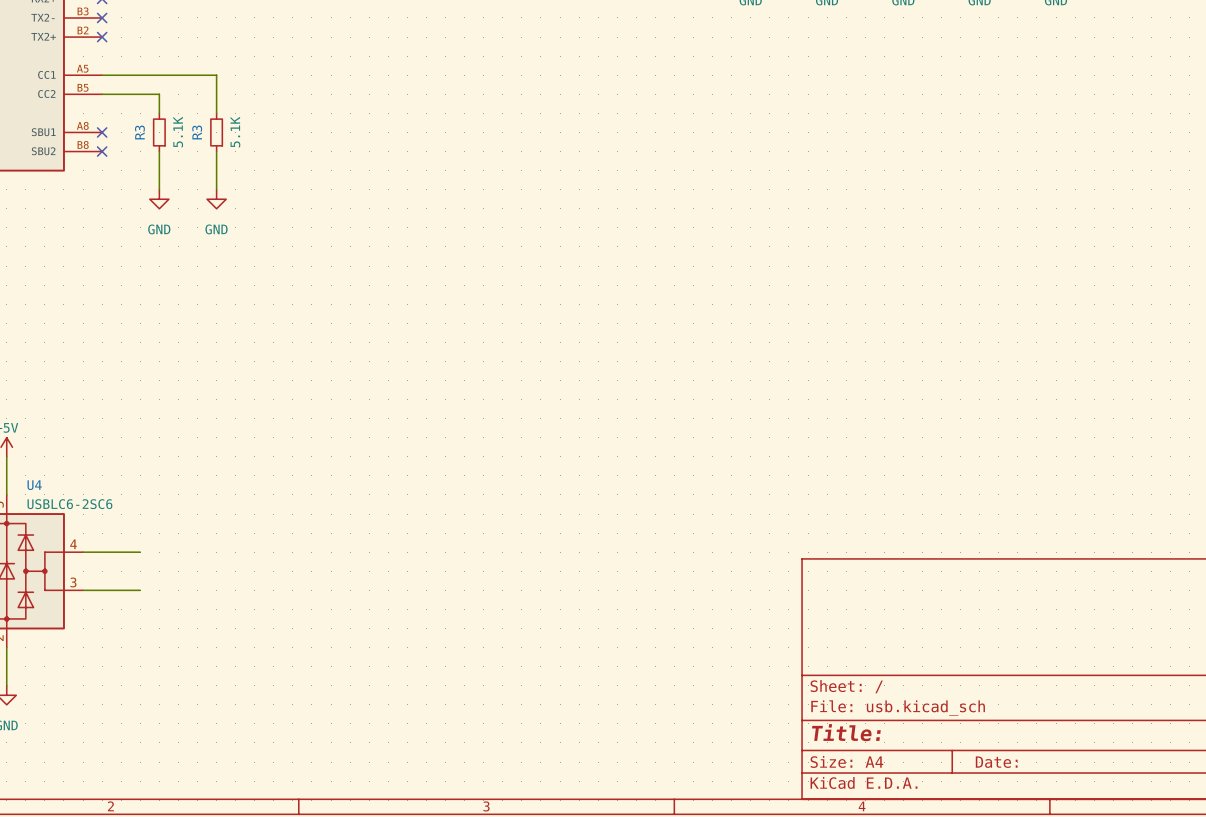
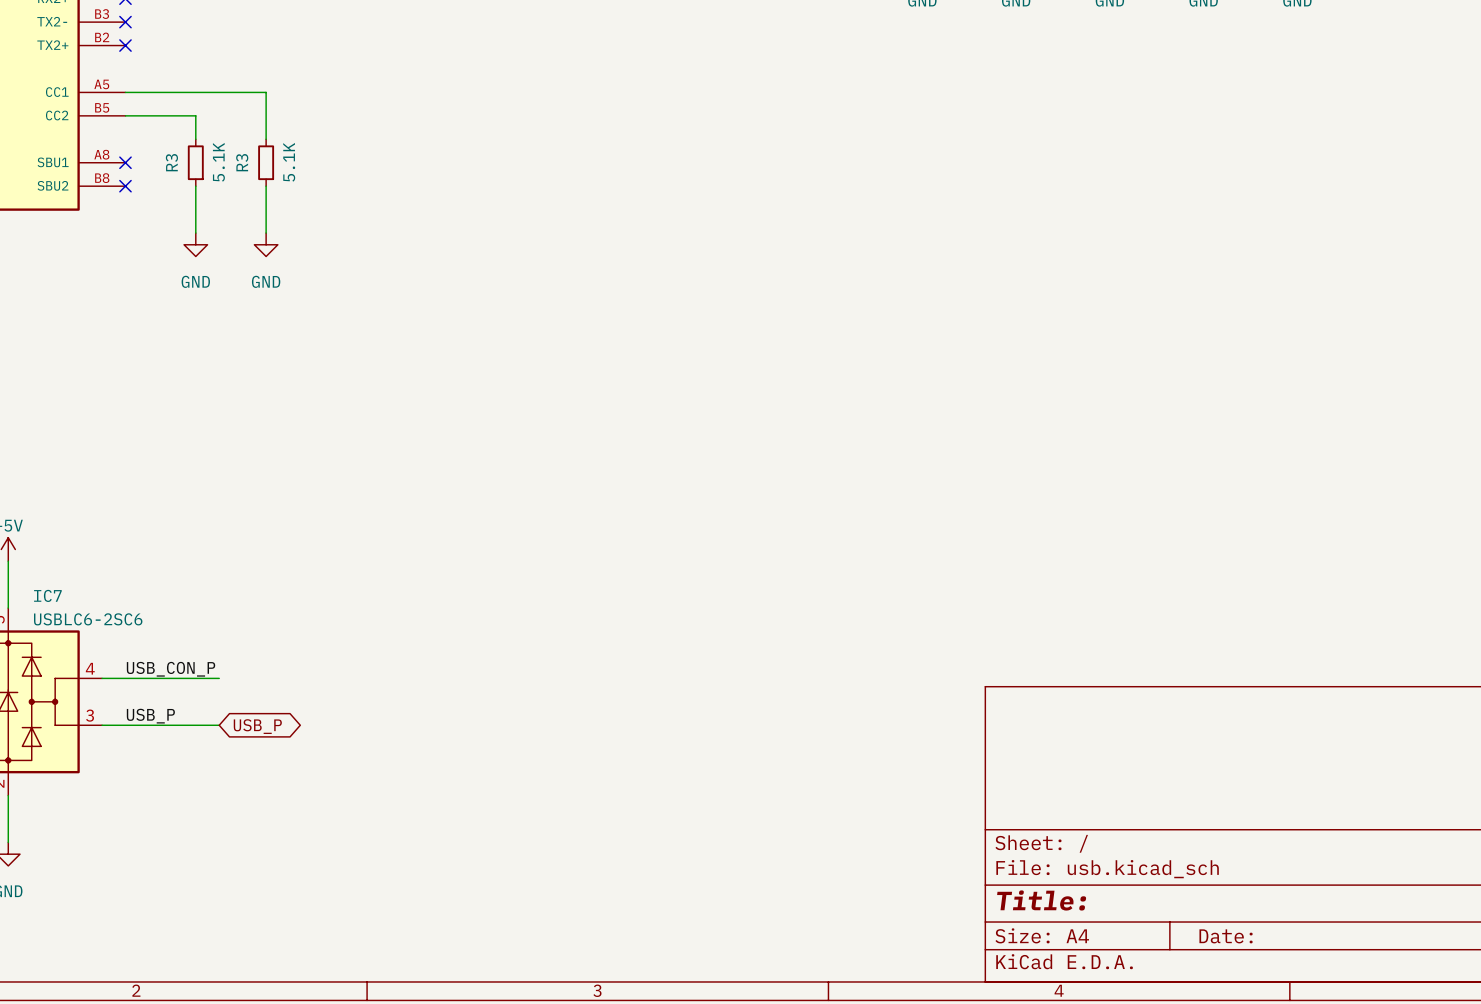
U4 name: U4 (34, 485) -> IC7 (47, 595)
label: none -> USB_CON_P (171, 669)
wire: none -> (172, 678) (219, 678)
label: none -> USB_P (150, 716)
wire: none -> (172, 725) (219, 725)
global label: none -> USB_P (257, 726)

